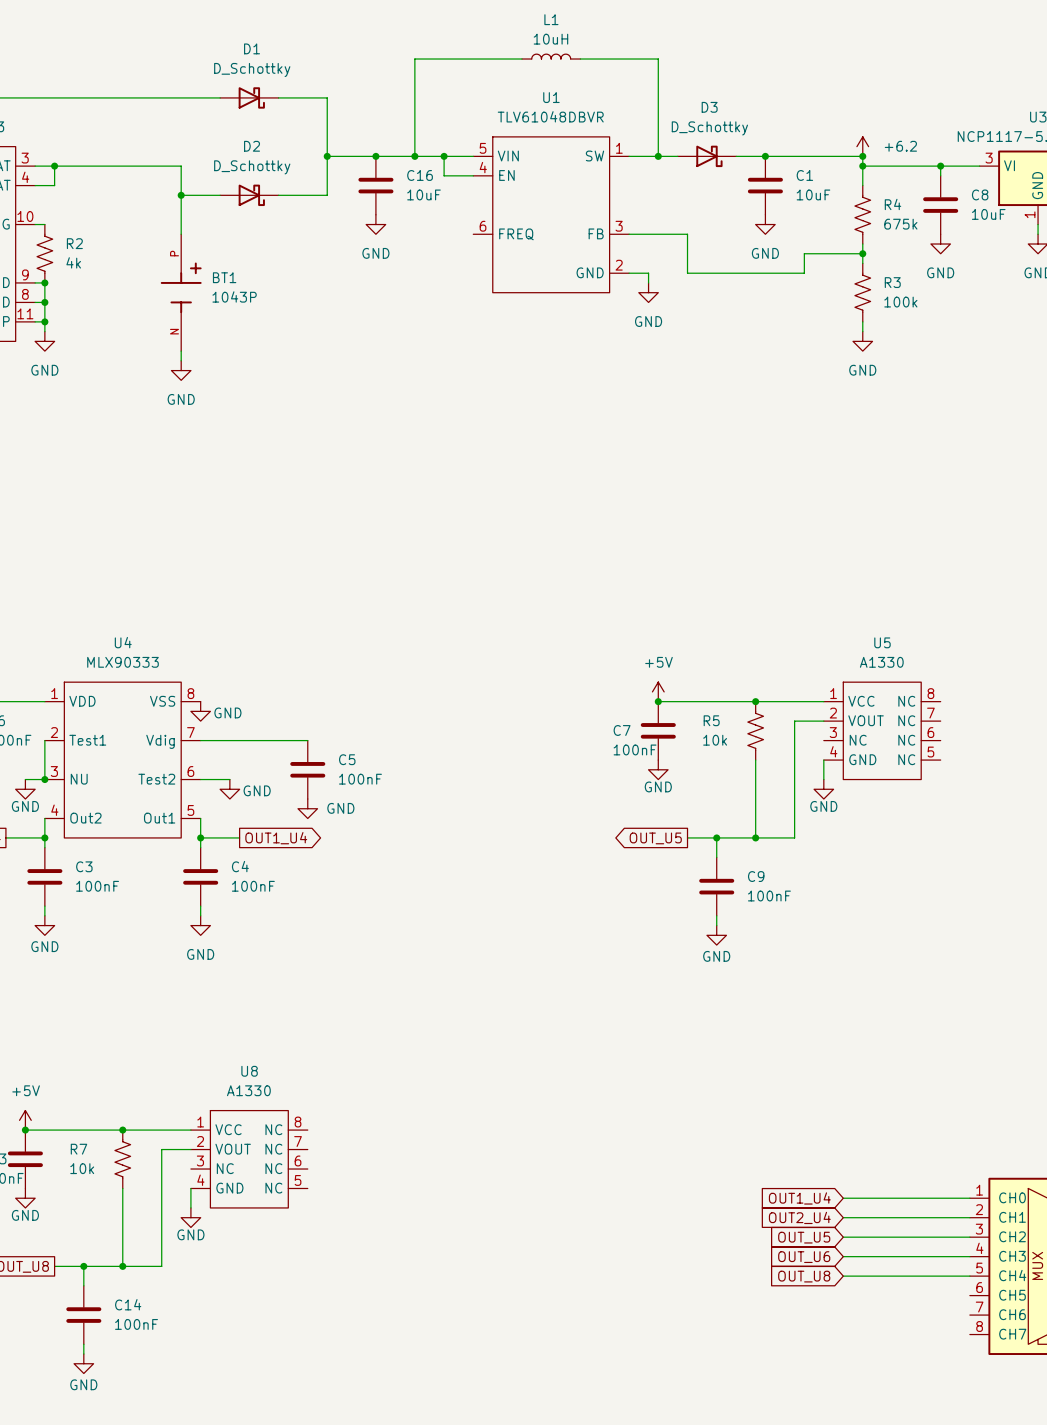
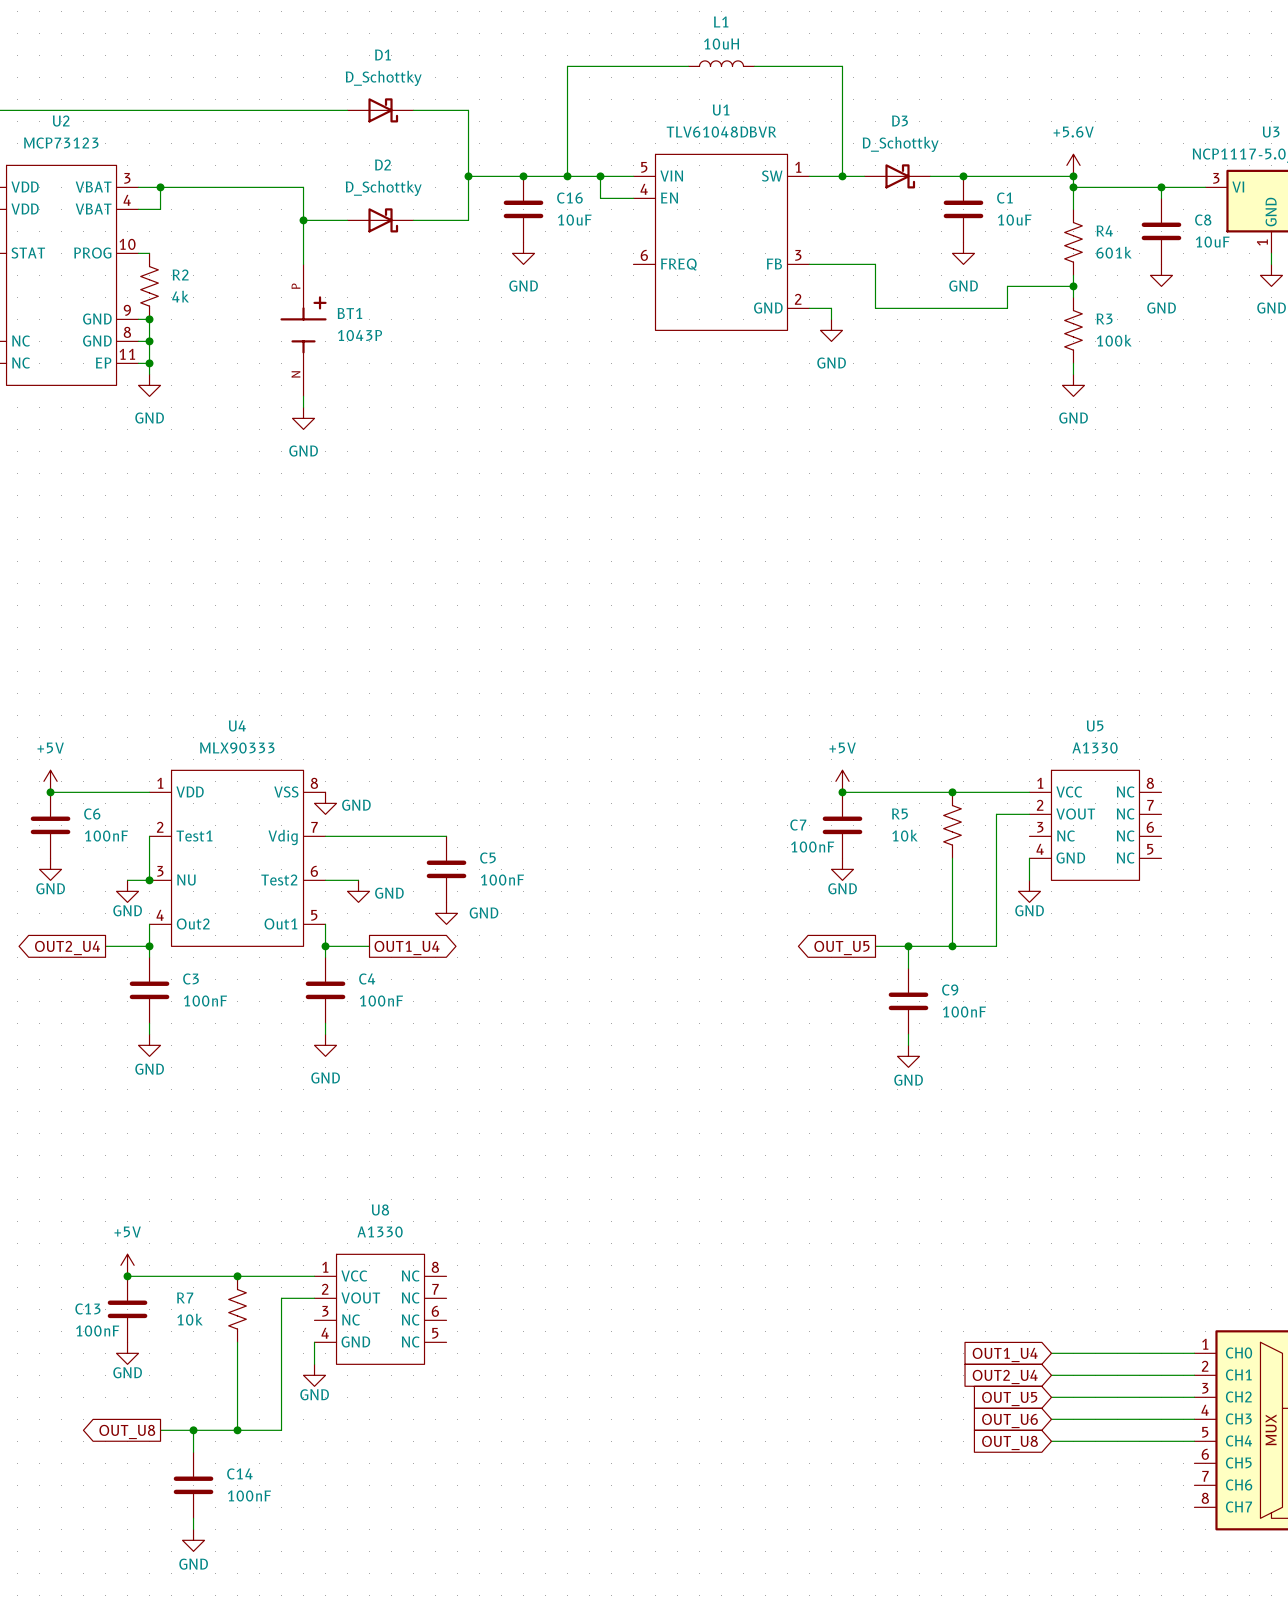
power symbol: +6.2 (862, 146) -> +5.6V (1073, 165)
R4 value: 675k (900, 224) -> 601k (1114, 252)

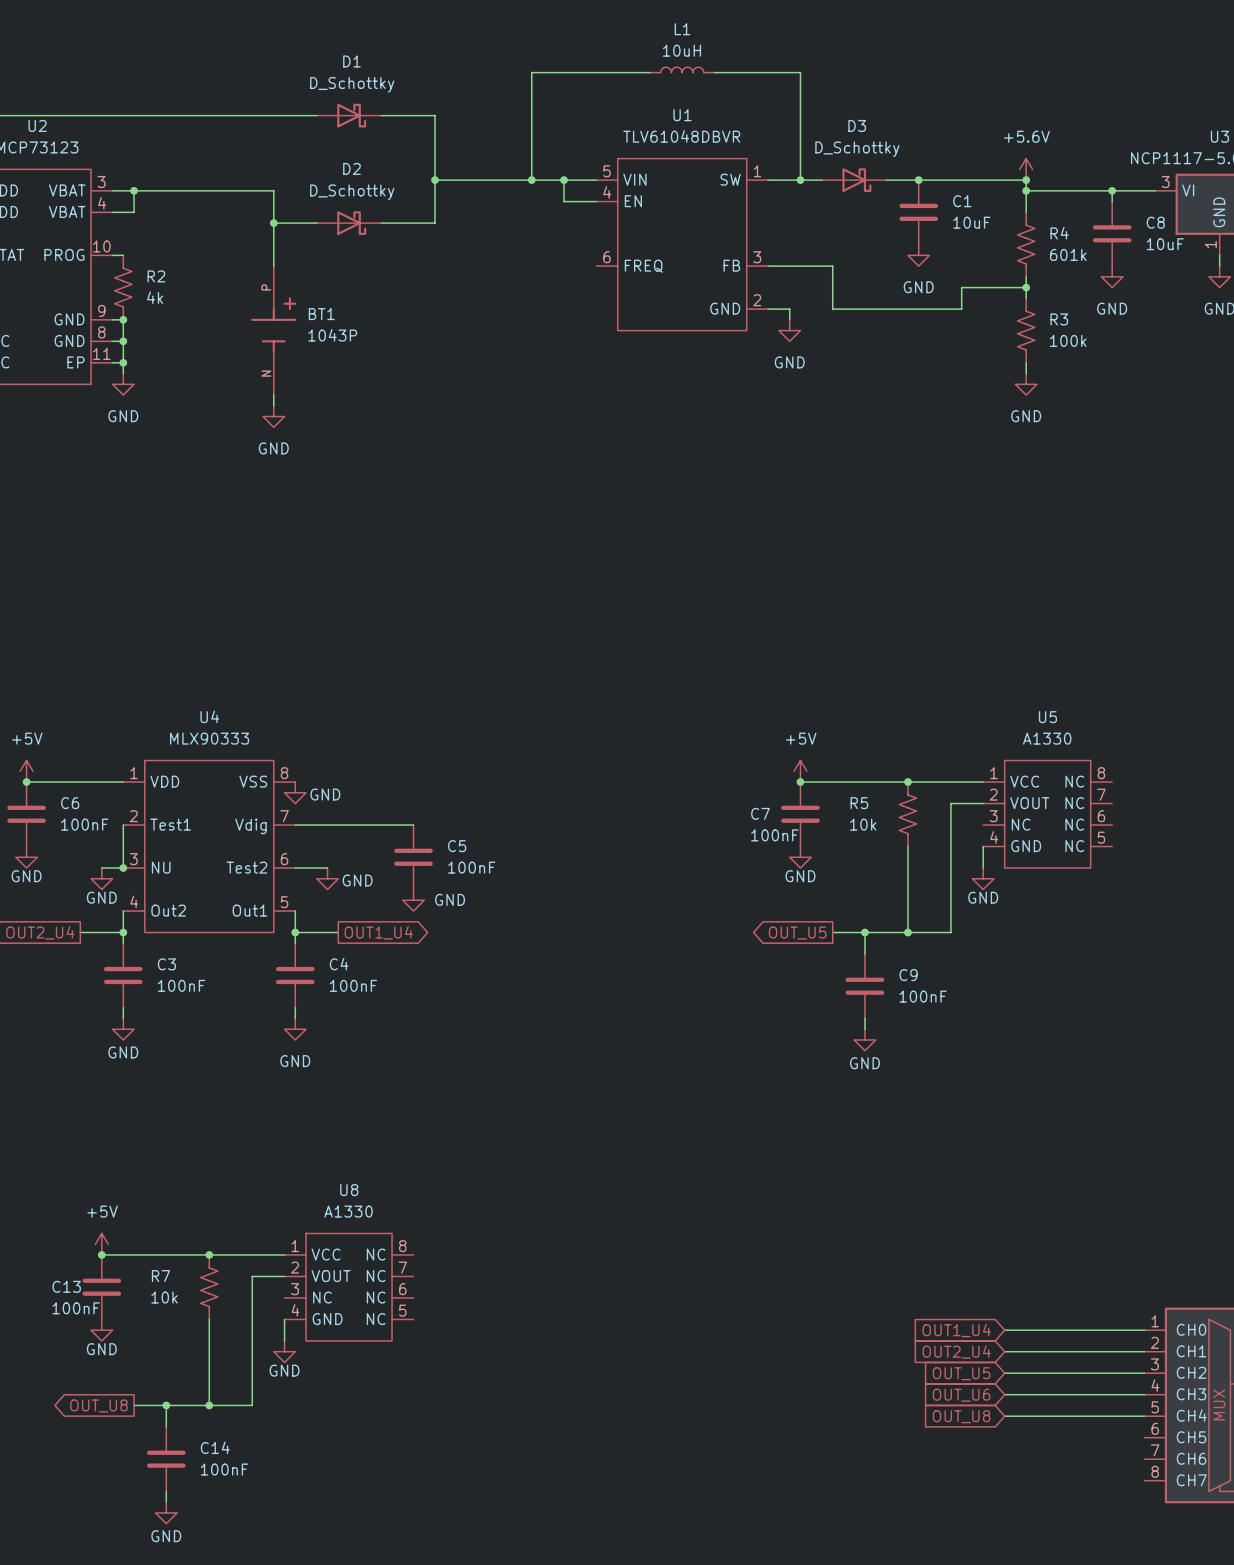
junction: (523, 176) -> none
C16: 10uF (523, 209) -> none
power symbol: GND (523, 253) -> none

